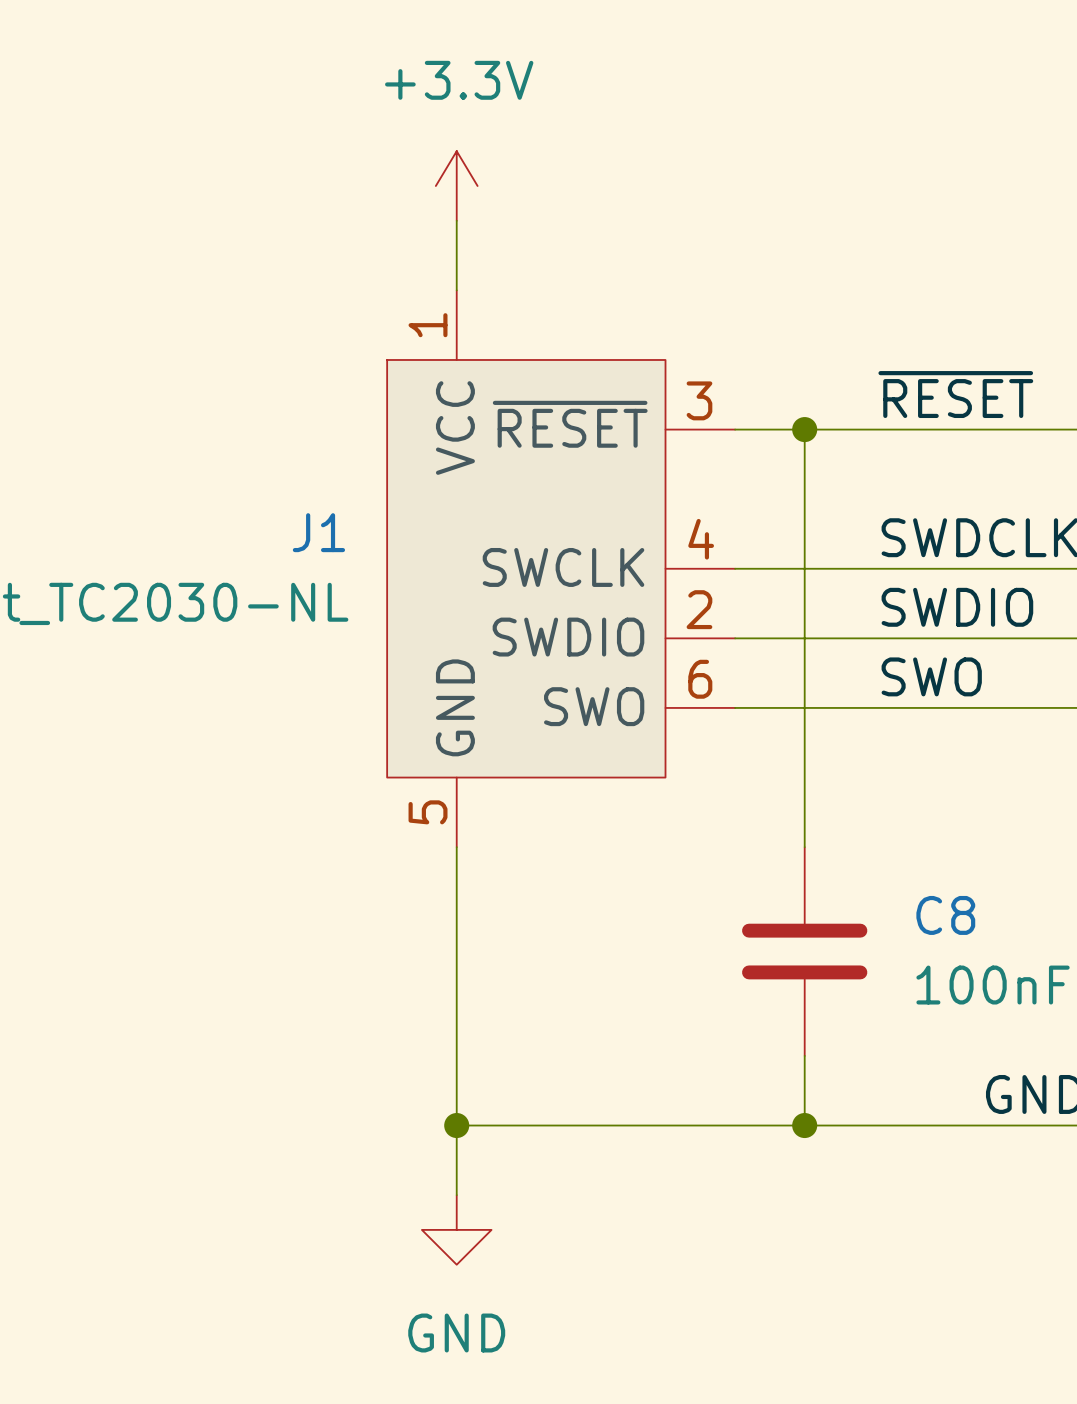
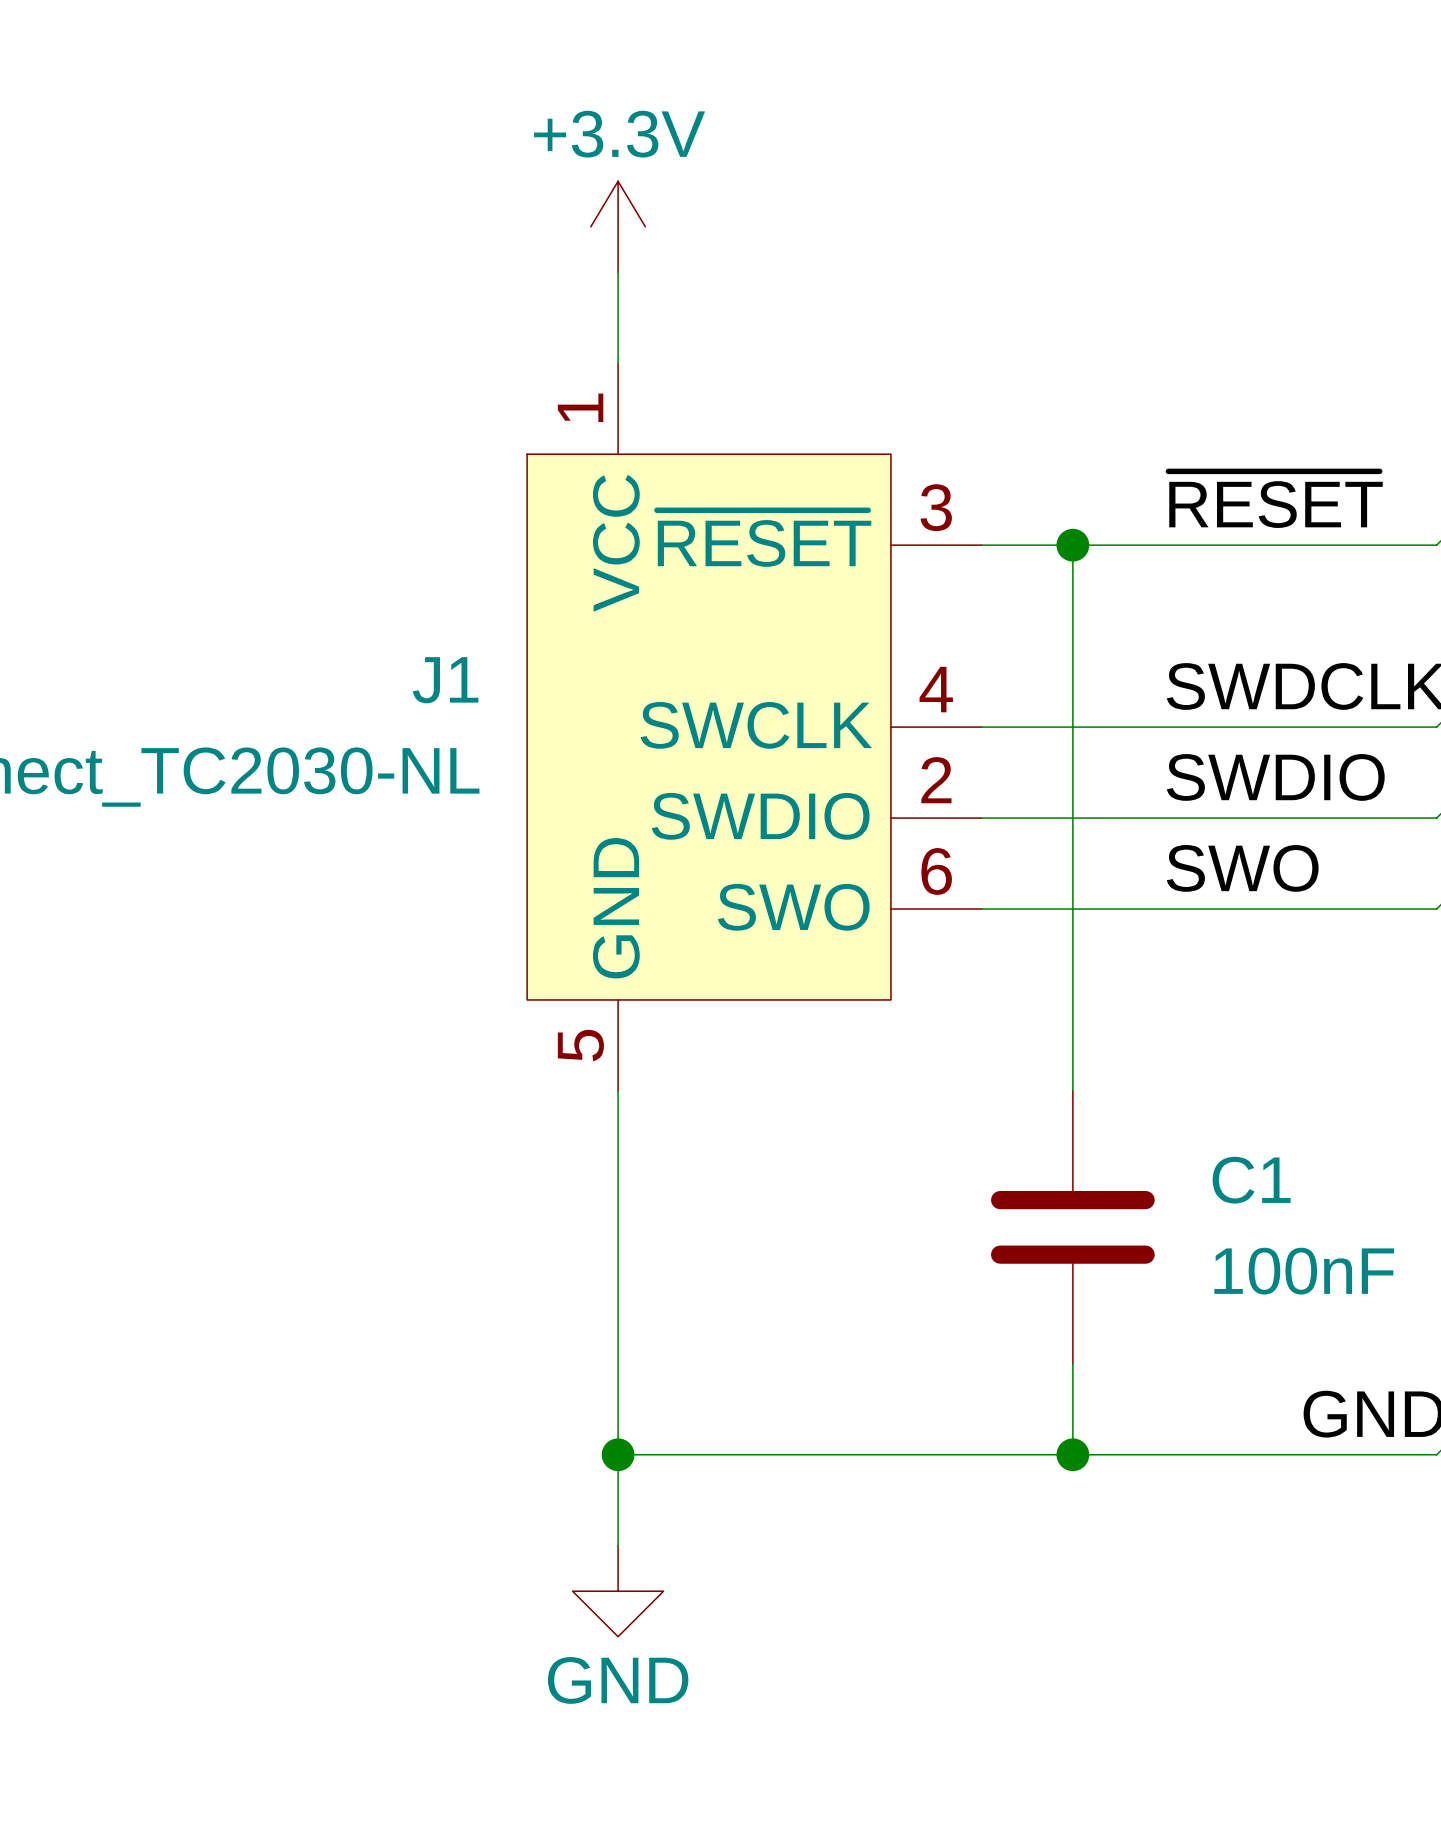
power symbol text position: +3.3V (459, 80) -> +3.3V (619, 134)
C8 name: C8 (945, 915) -> C1 (1251, 1180)
power symbol text position: GND (456, 1333) -> GND (618, 1680)

